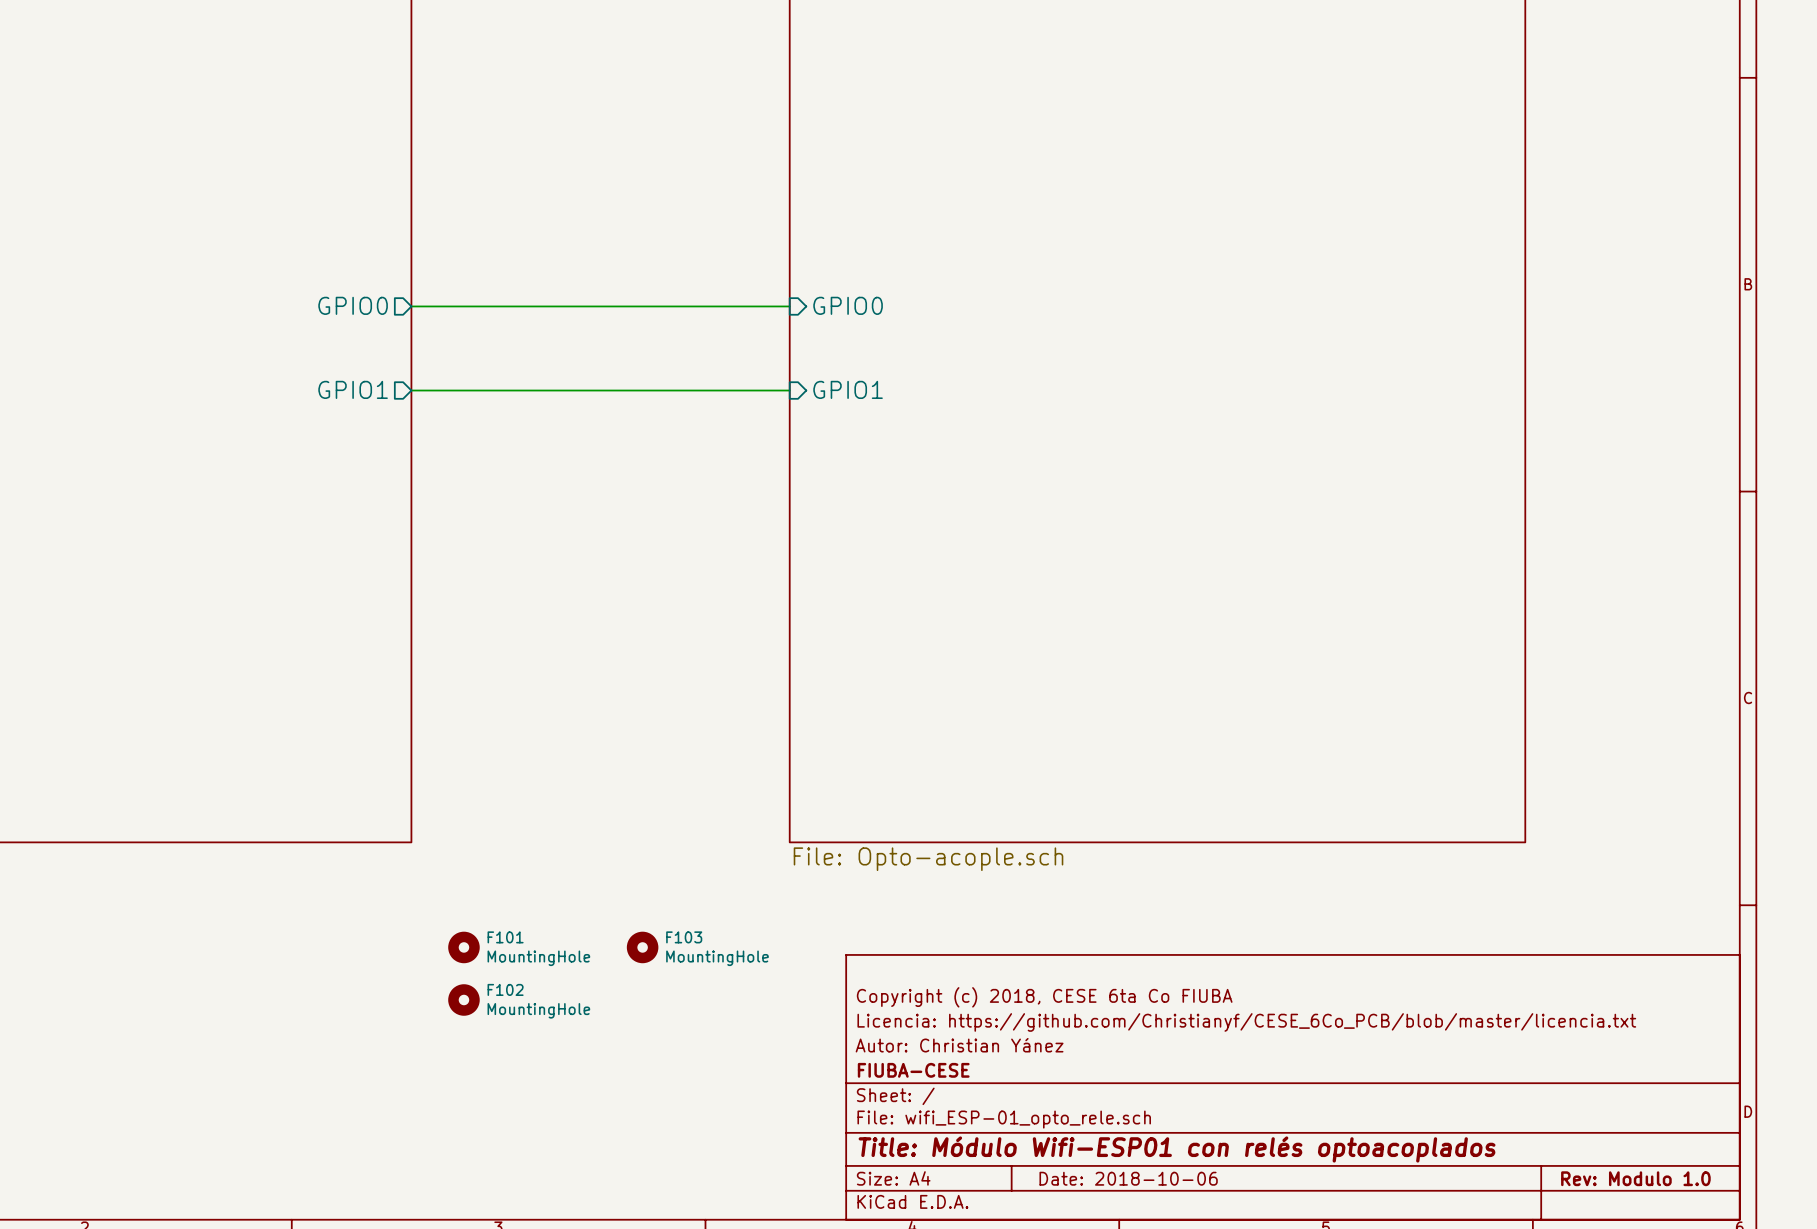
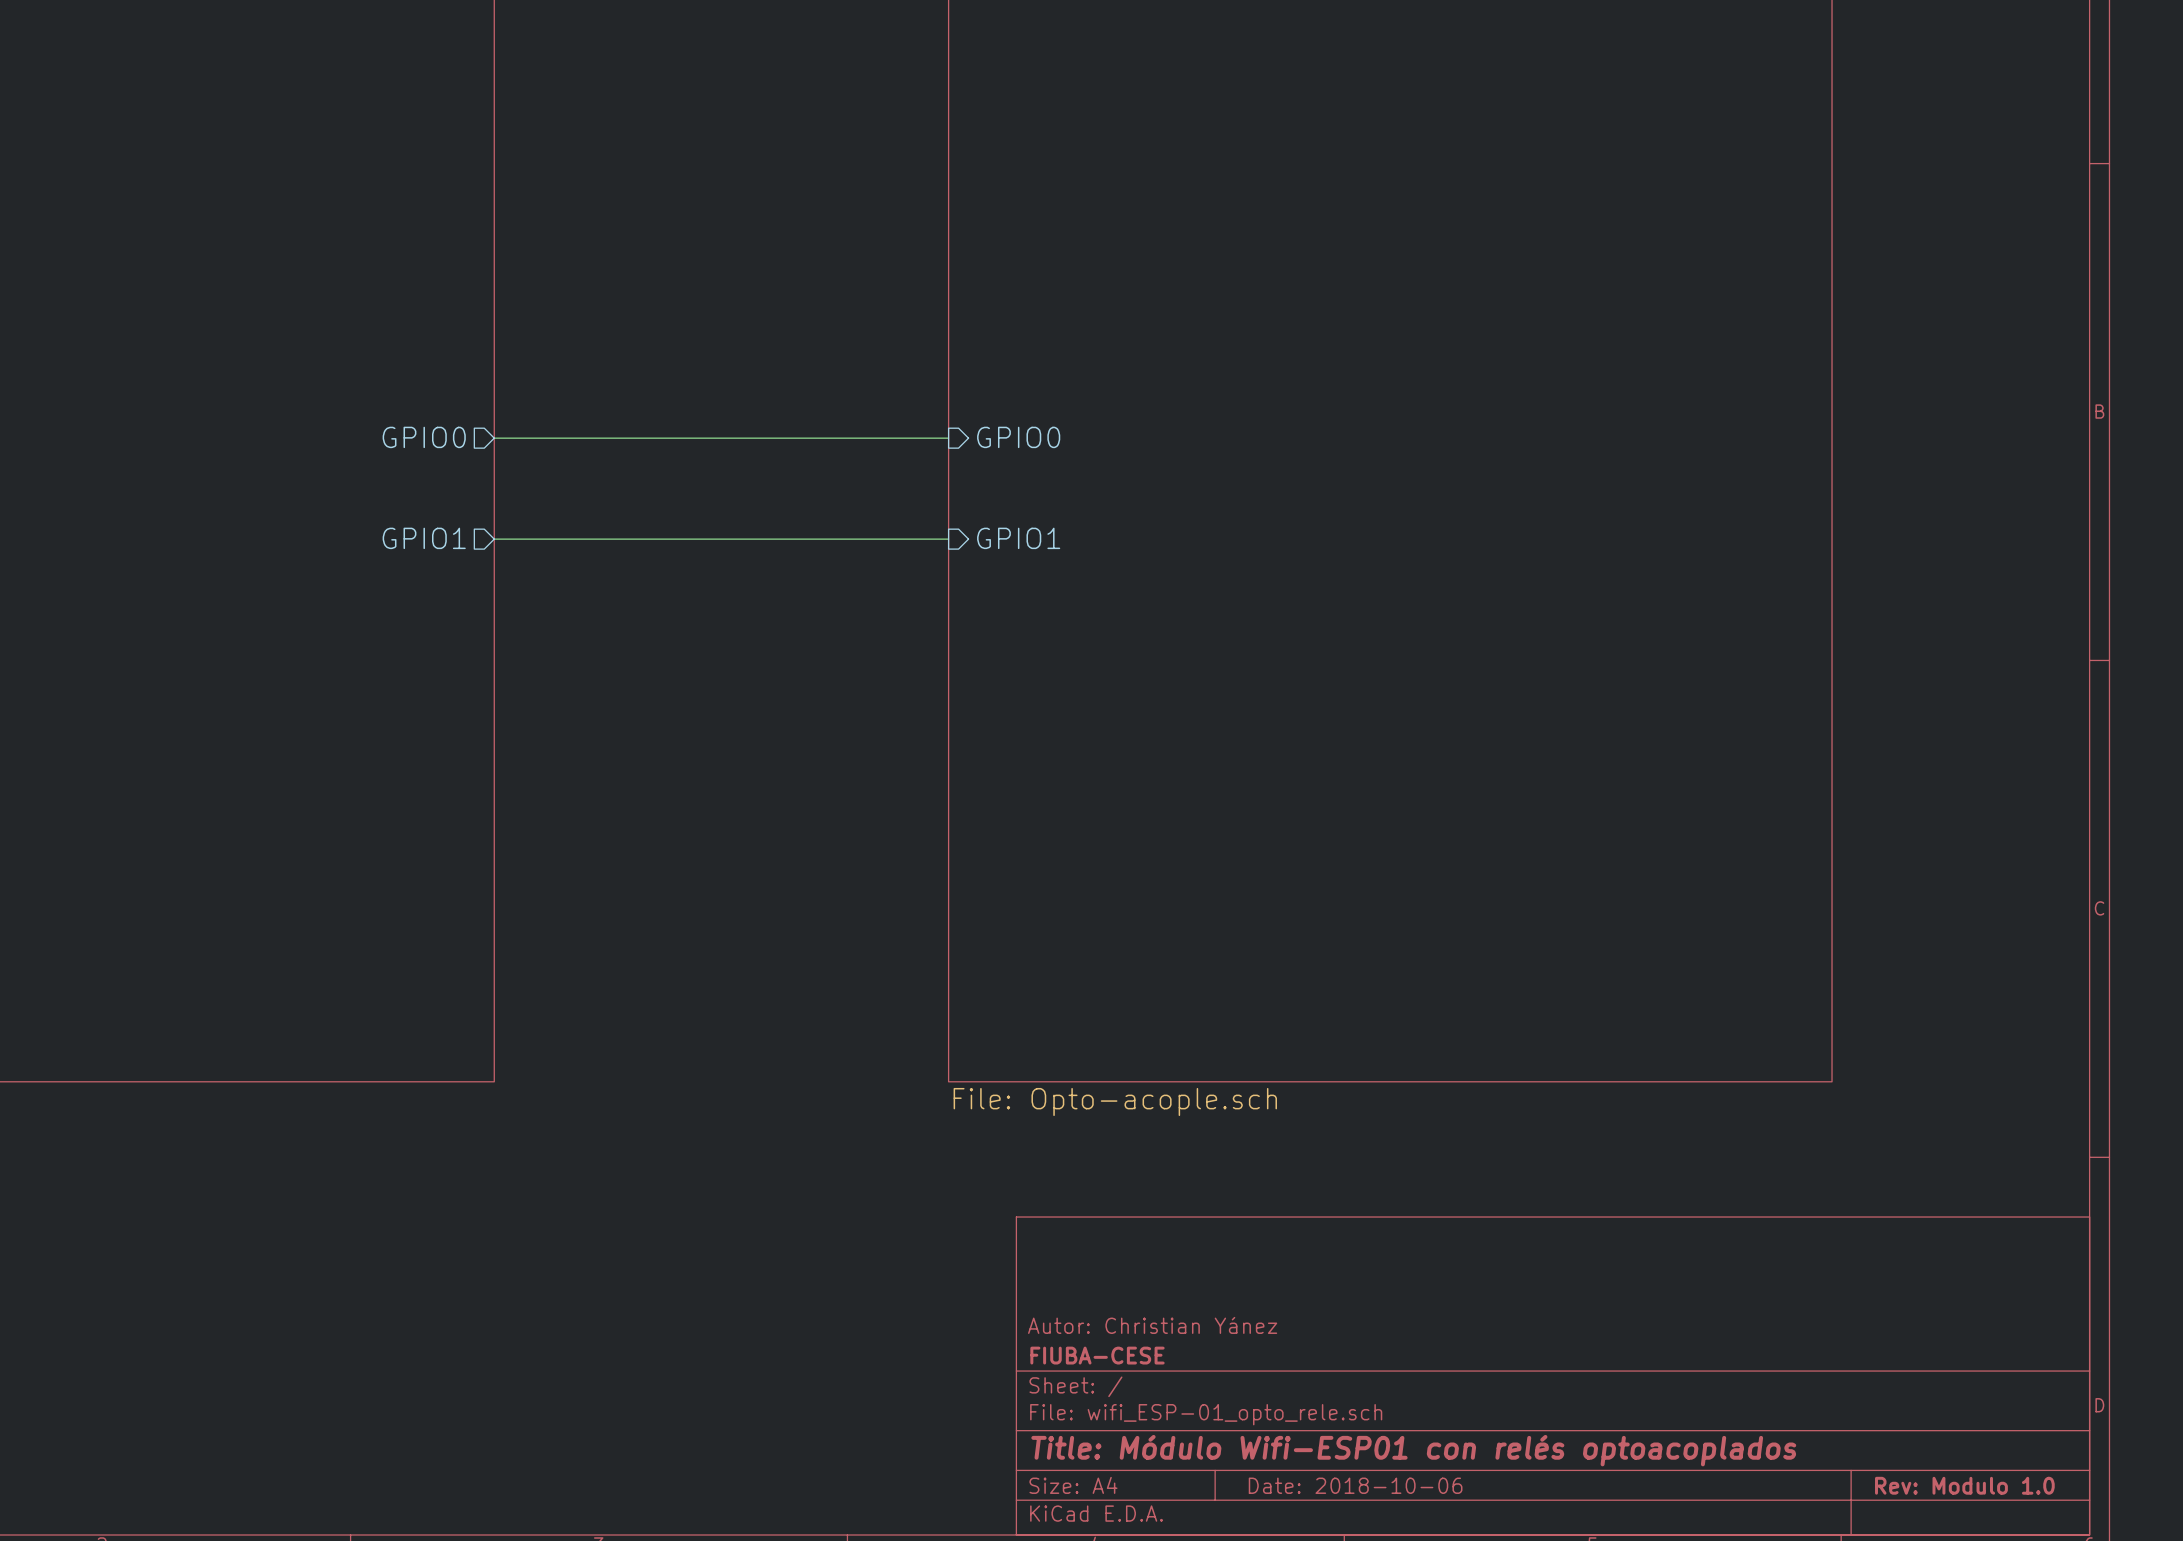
F101: MountingHole (463, 947) -> none
F103: MountingHole (642, 947) -> none
title block: Copyright (c) 2018, CESE 6ta Co FIUBA (1044, 997) -> none
F102: MountingHole (463, 999) -> none
title block: Licencia: https://github.com/Christianyf/CESE_6Co_PCB/blob/master/licencia.txt (1246, 1022) -> none

